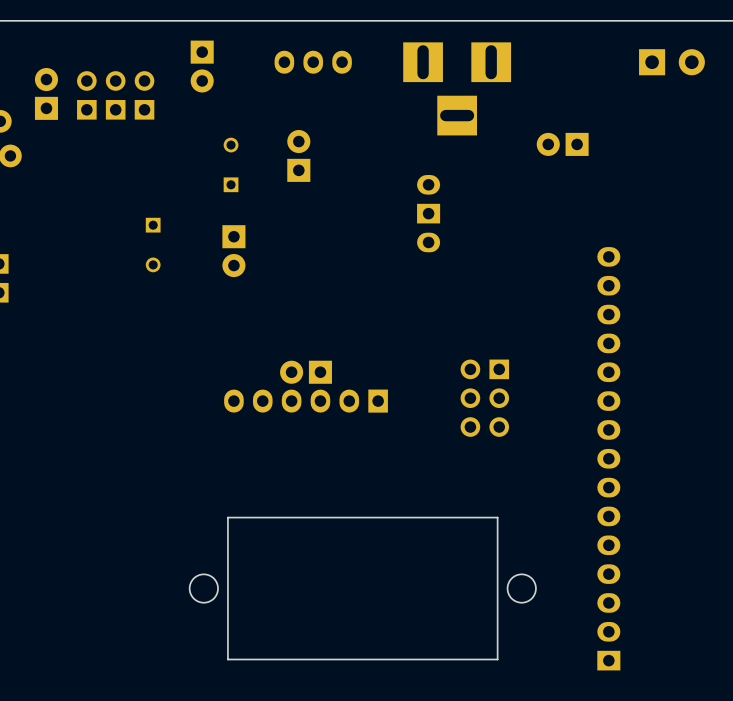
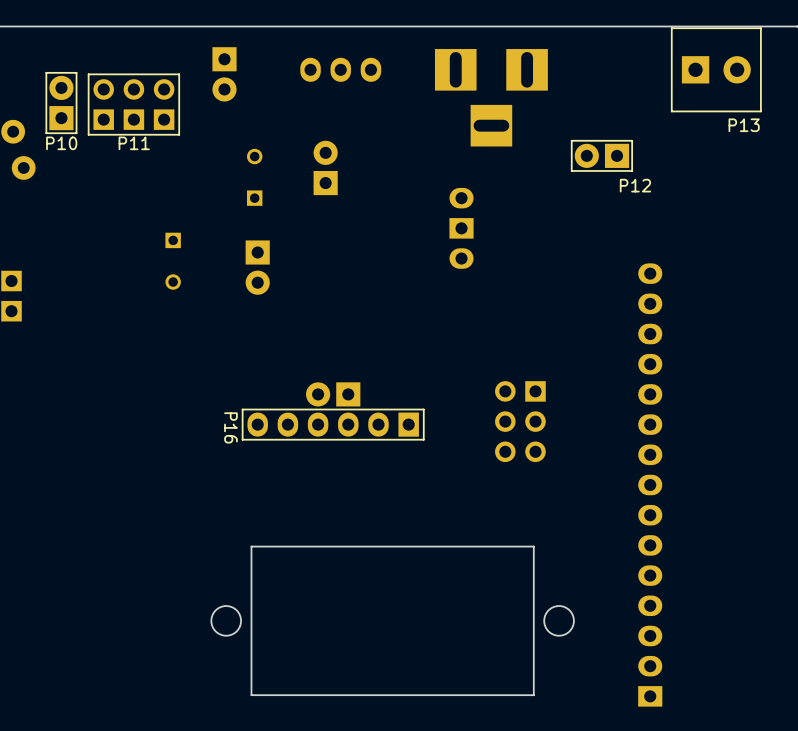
P13: none -> (716, 69)
part: (46, 93) -> none
P10: none -> (61, 103)
P11: none -> (133, 104)
part: (562, 144) -> none
P12: none -> (601, 155)
part: (306, 401) -> none
P16: none -> (333, 424)

